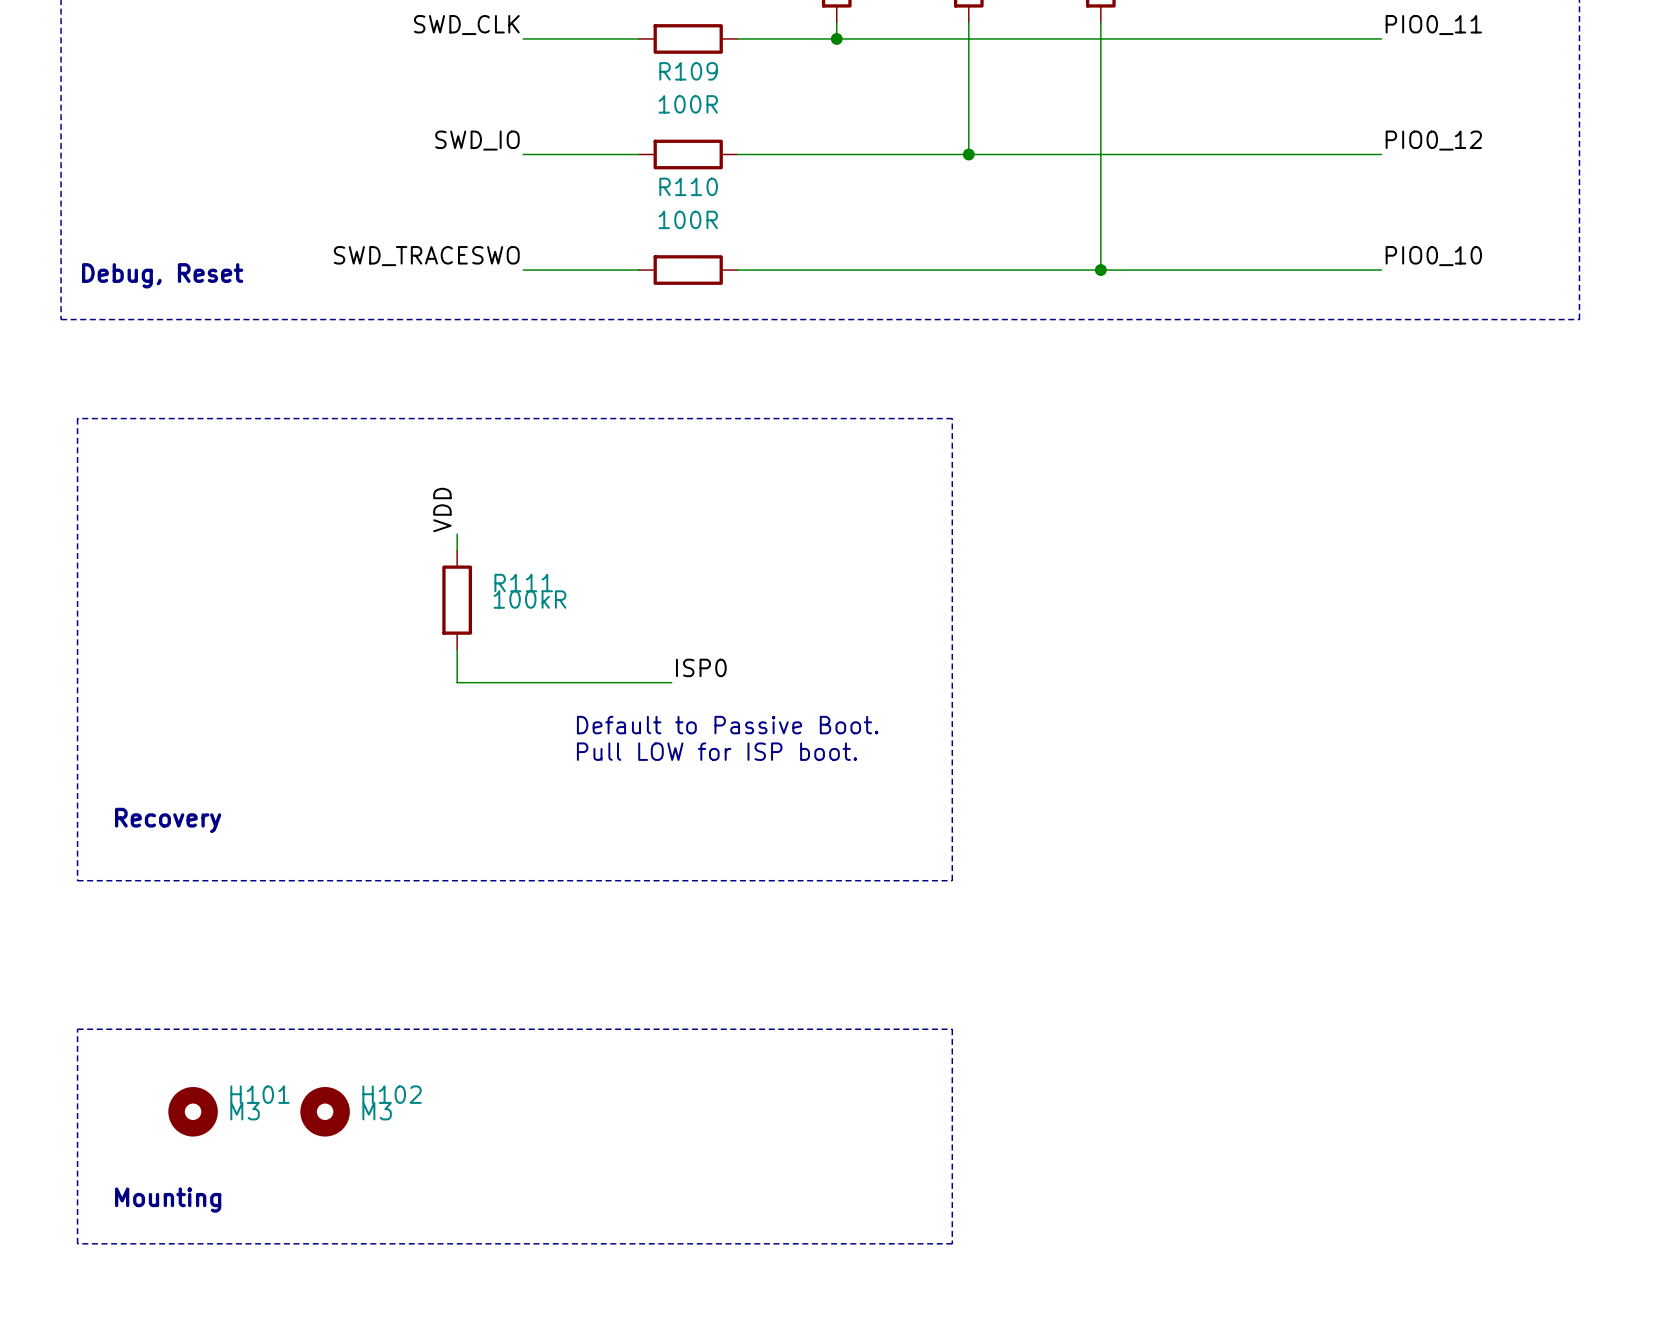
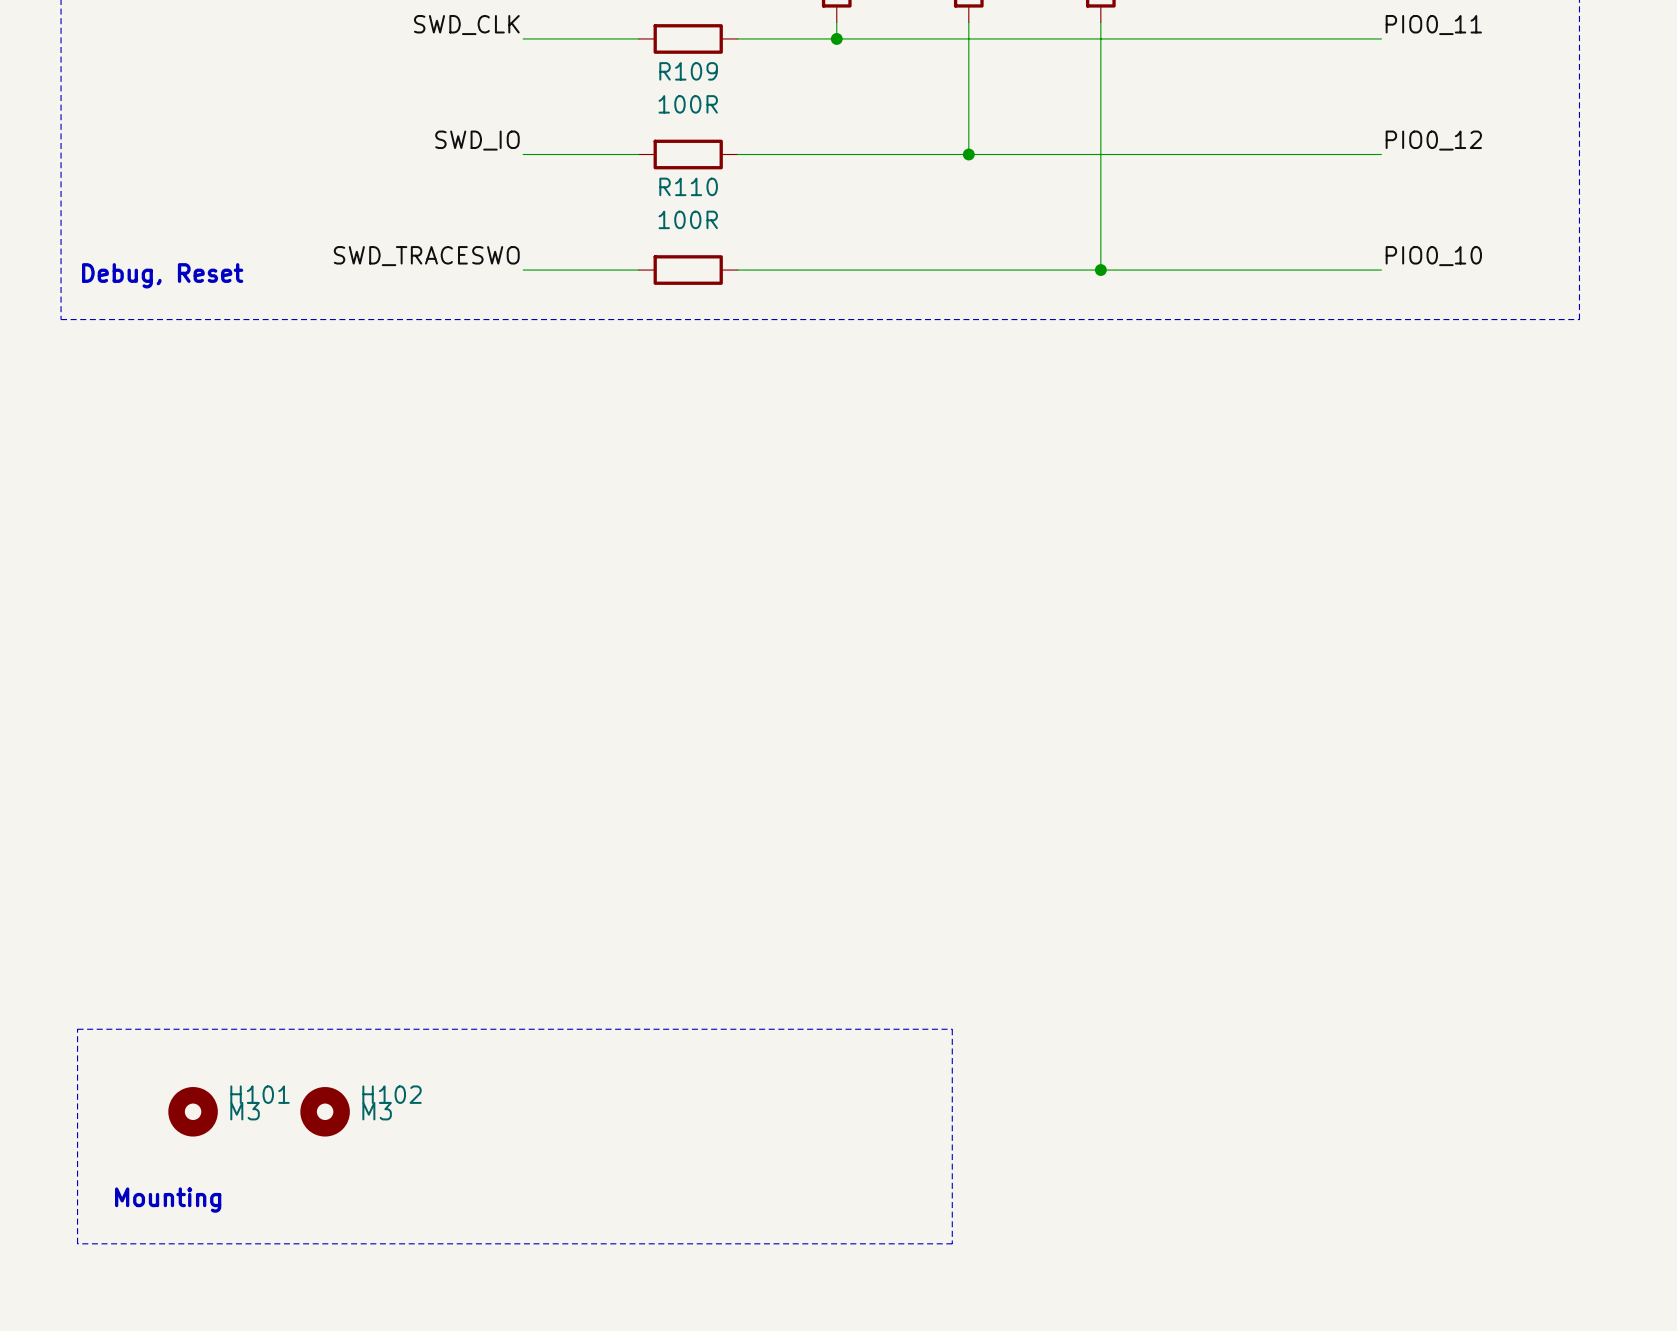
line: (77, 418) (952, 418) (952, 880) (77, 880) (77, 418) -> none
label: VDD (442, 510) -> none
wire: (457, 534) (457, 550) -> none
R111: 100kR (457, 600) -> none
wire: (457, 649) (457, 682) (671, 682) -> none
label: ISP0 (701, 667) -> none
text: Default to Passive Boot. (727, 725) -> none
text: Pull LOW for ISP boot. (717, 751) -> none
text: Recovery (168, 820) -> none

